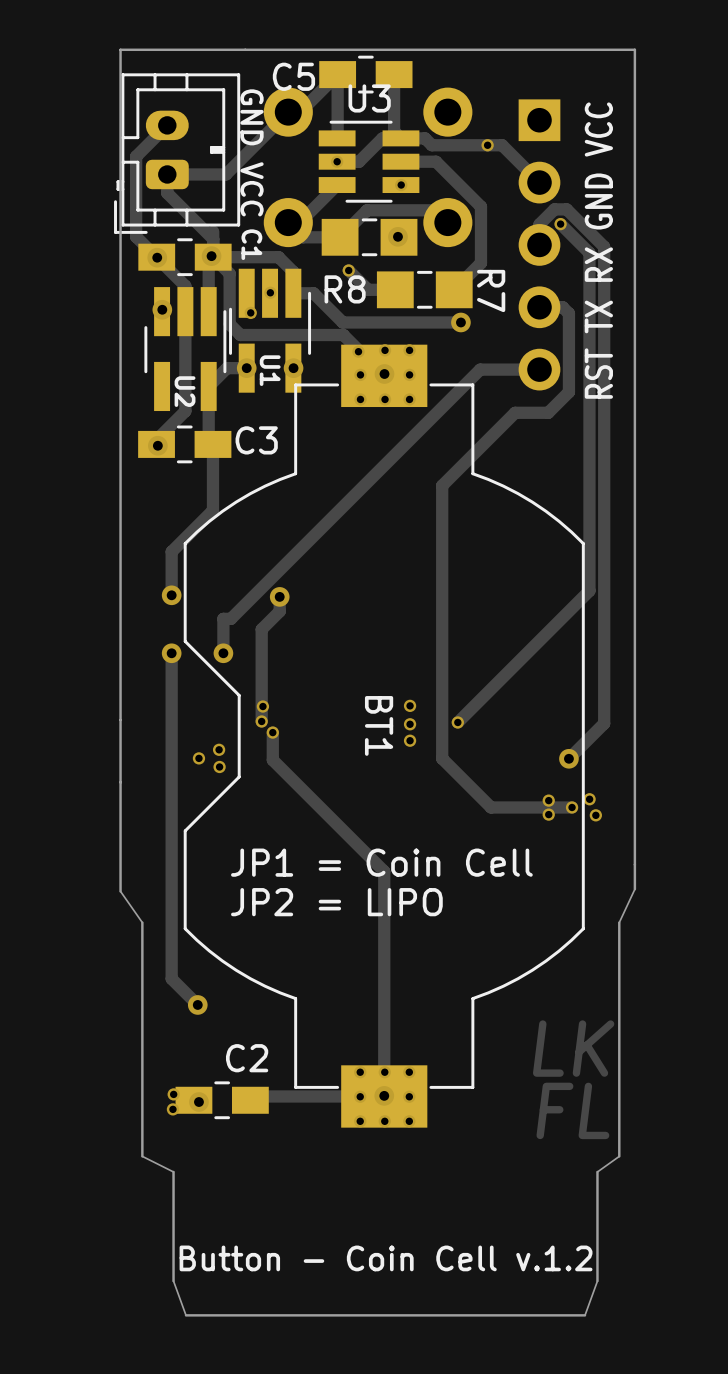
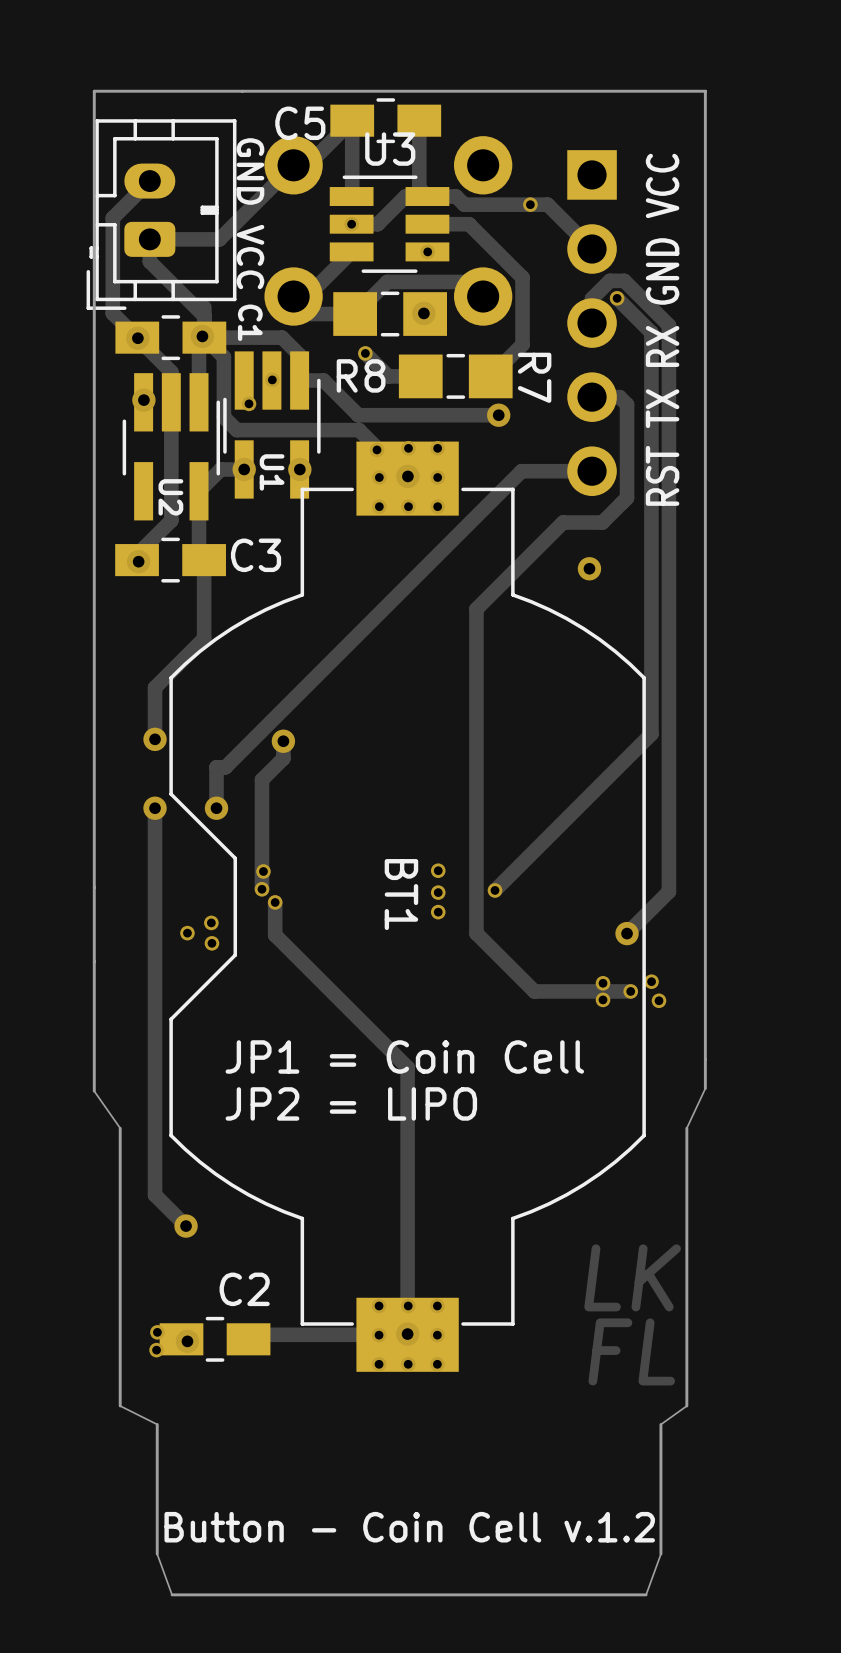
via: none -> (589, 568)

